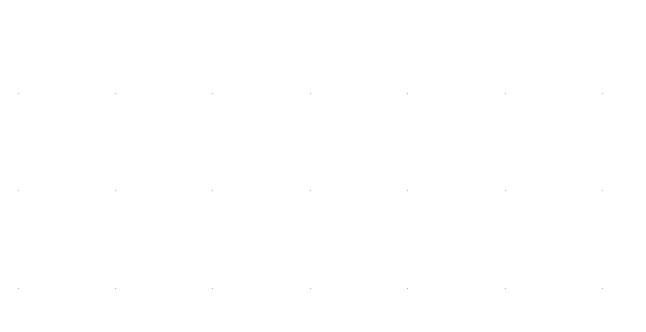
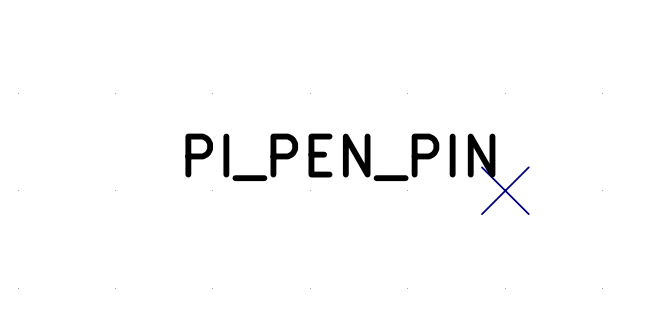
label: none -> PI_PEN_PIN (340, 157)
no-connect mark: none -> (505, 190)

